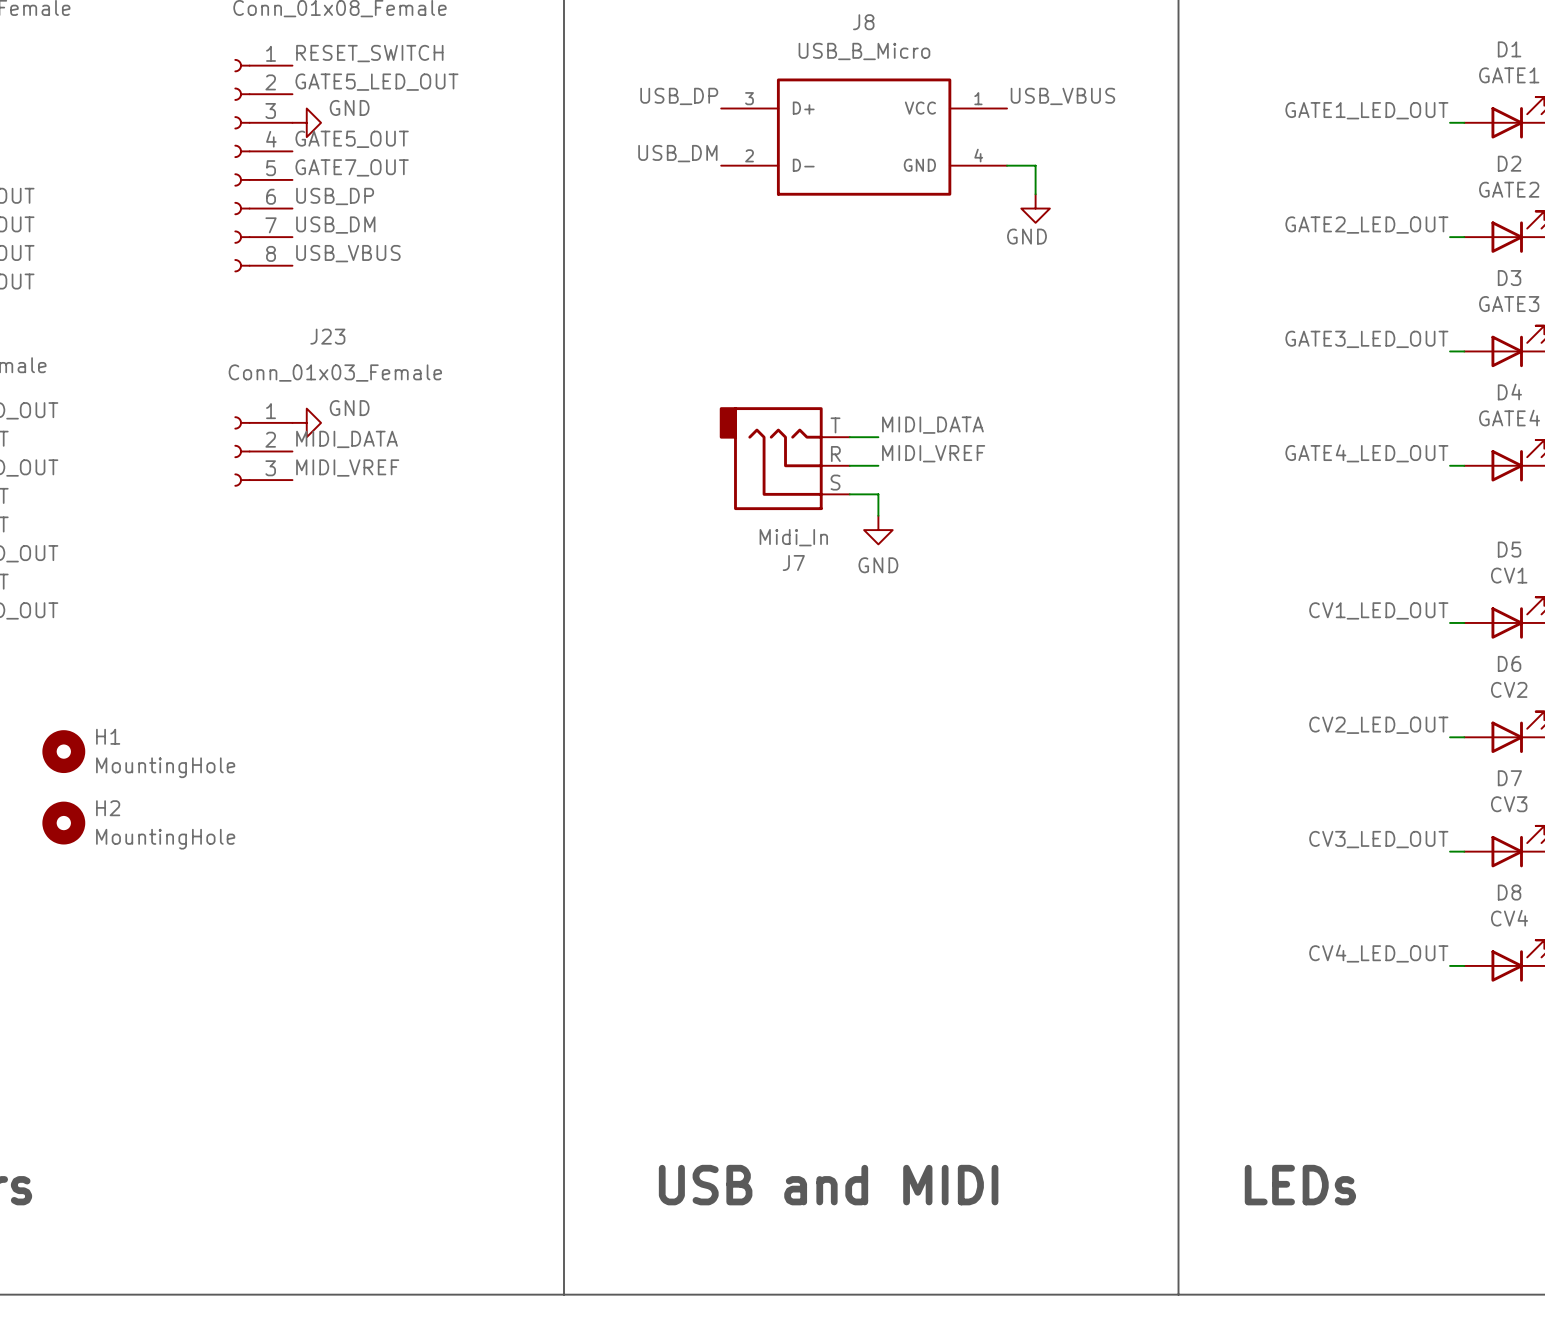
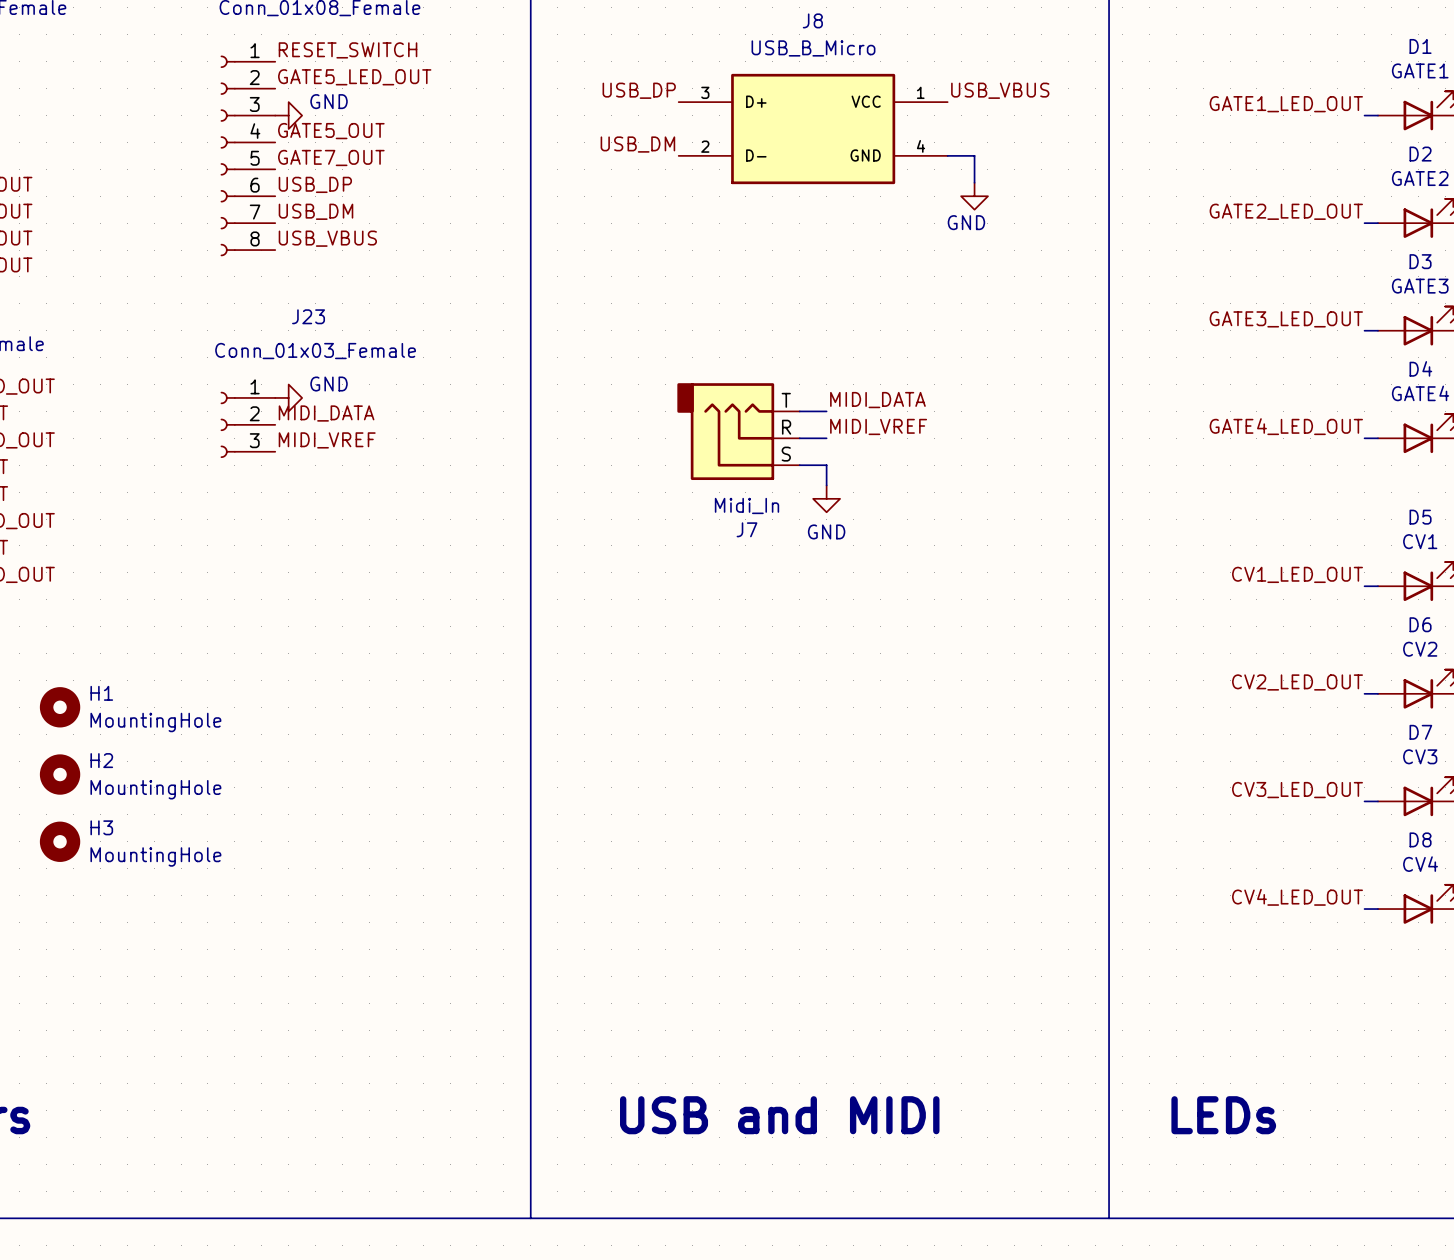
H3: none -> MountingHole (60, 841)

